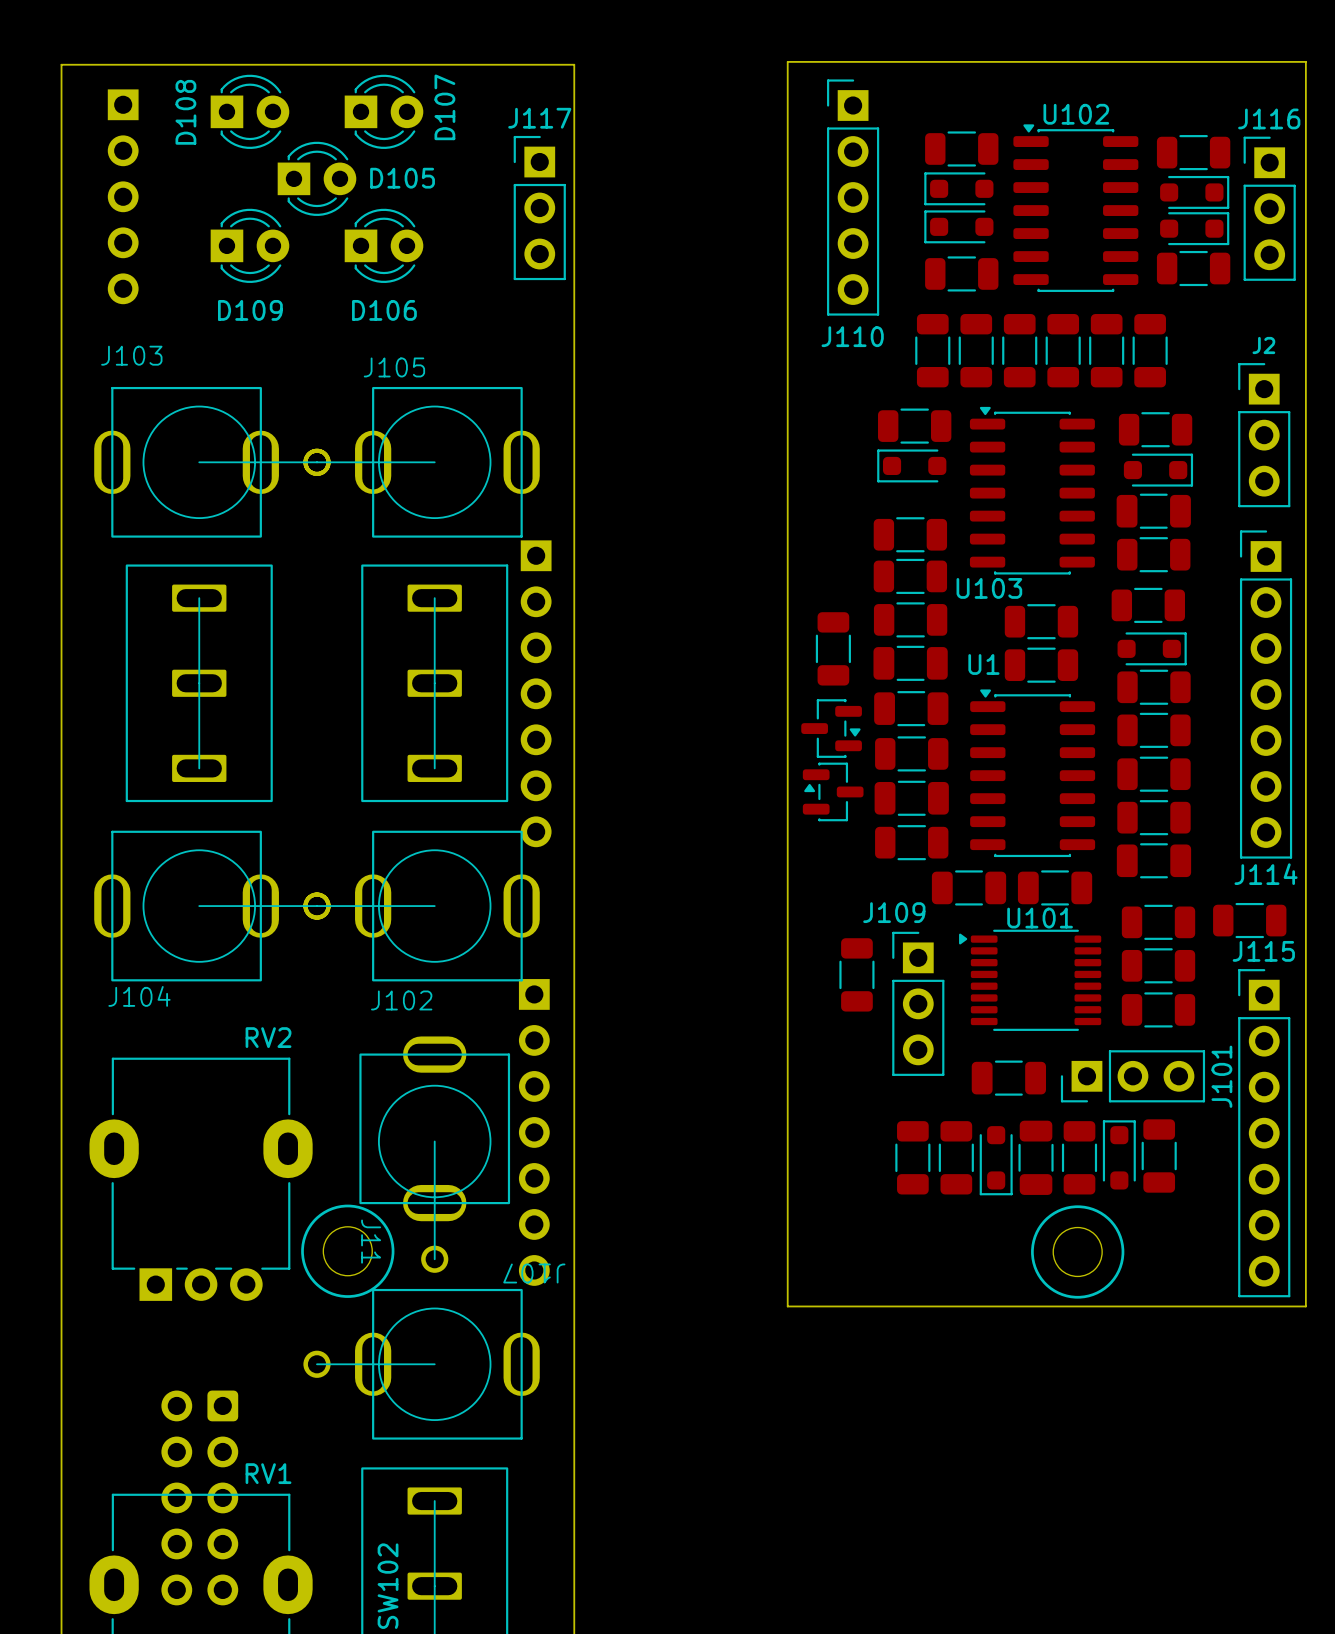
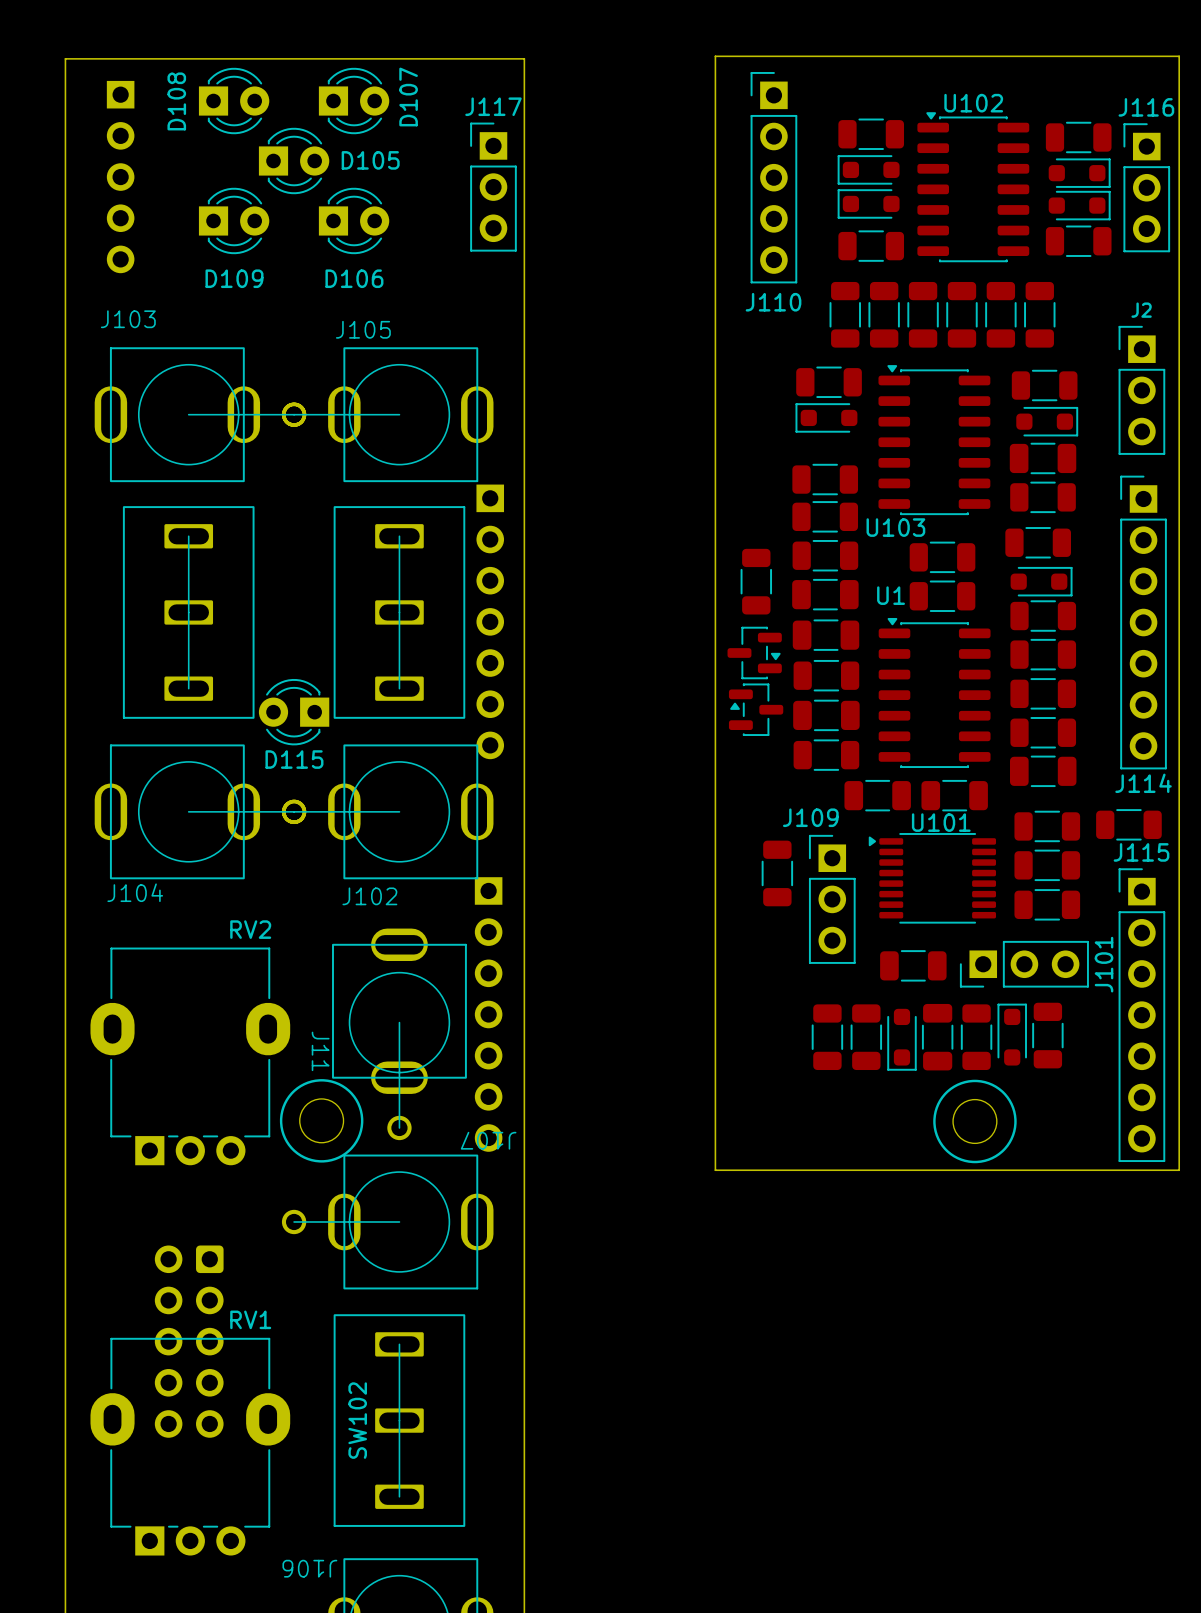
D115: none -> (294, 712)
J11 name position: J11 (371, 1241) -> J11 (320, 1051)

